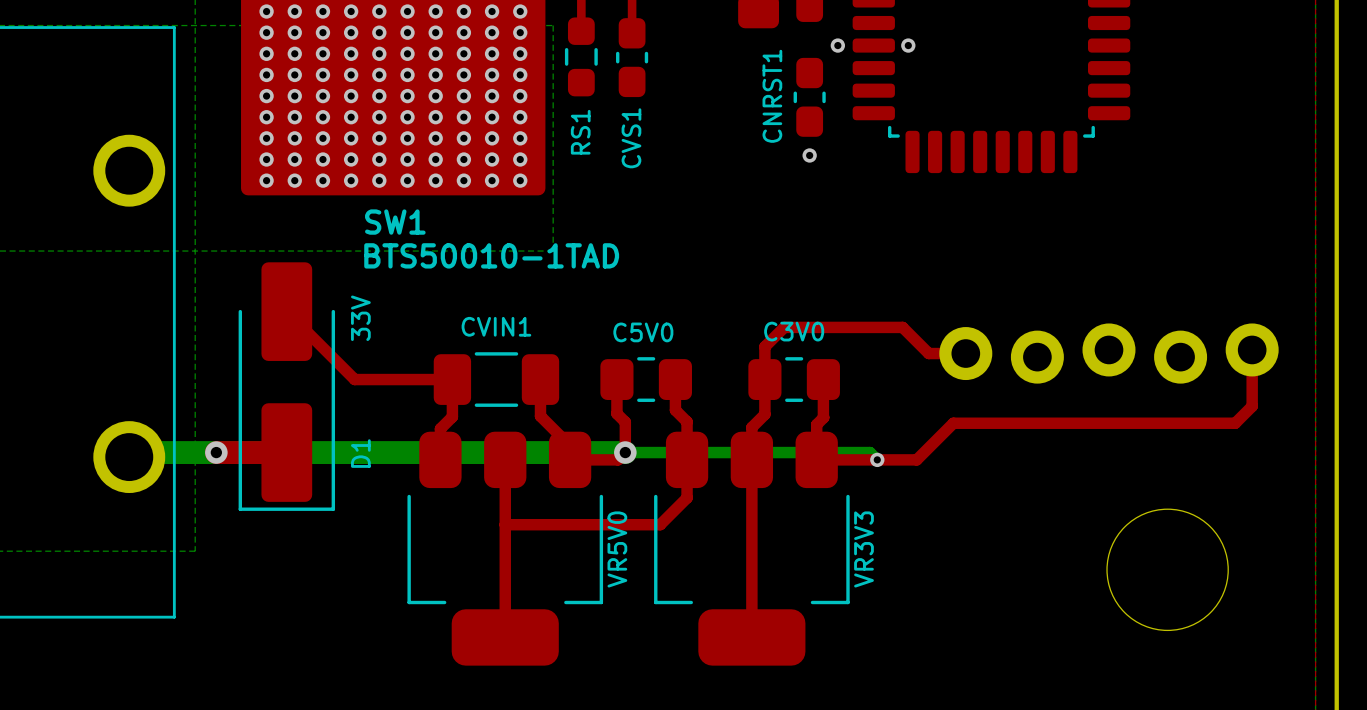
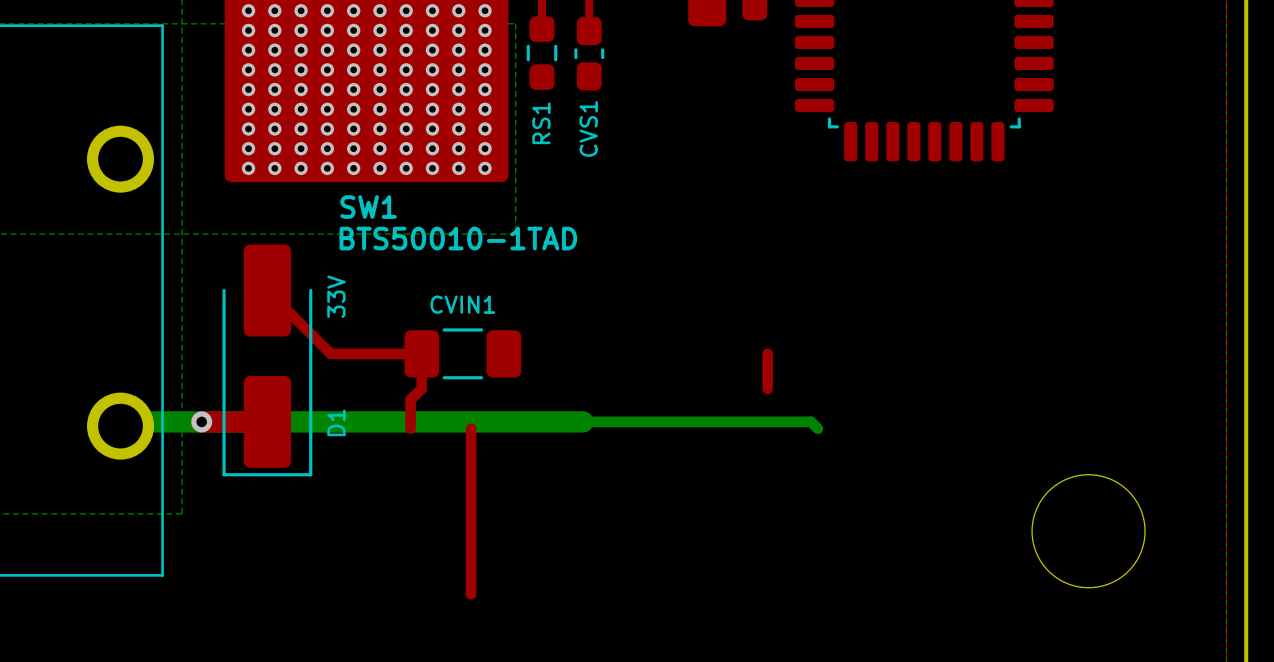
via: (837, 45) -> none
via: (908, 45) -> none
CNRST1: (809, 97) -> none
via: (809, 155) -> none
top track: (1252, 349) (1252, 406) (1235, 423) (953, 423) (916, 459) (816, 459) (816, 424) (823, 417) -> none
top track: (965, 353) (928, 353) (902, 327) (784, 327) (764, 346) (764, 414) (751, 427) (751, 637) -> none
part: (1108, 353) -> none
top track: (540, 379) (540, 416) (570, 445) (570, 459) (618, 459) (625, 452) (625, 422) (616, 413) (616, 379) -> none
C5V0: (646, 379) -> none
top track: (675, 379) (675, 410) (687, 421) (687, 497) (660, 524) (505, 524) -> none
C3V0: (794, 379) -> none
via: (625, 452) -> none
via: (877, 459) -> none
VR5V0: (505, 548) -> none
VR3V3: (751, 548) -> none

